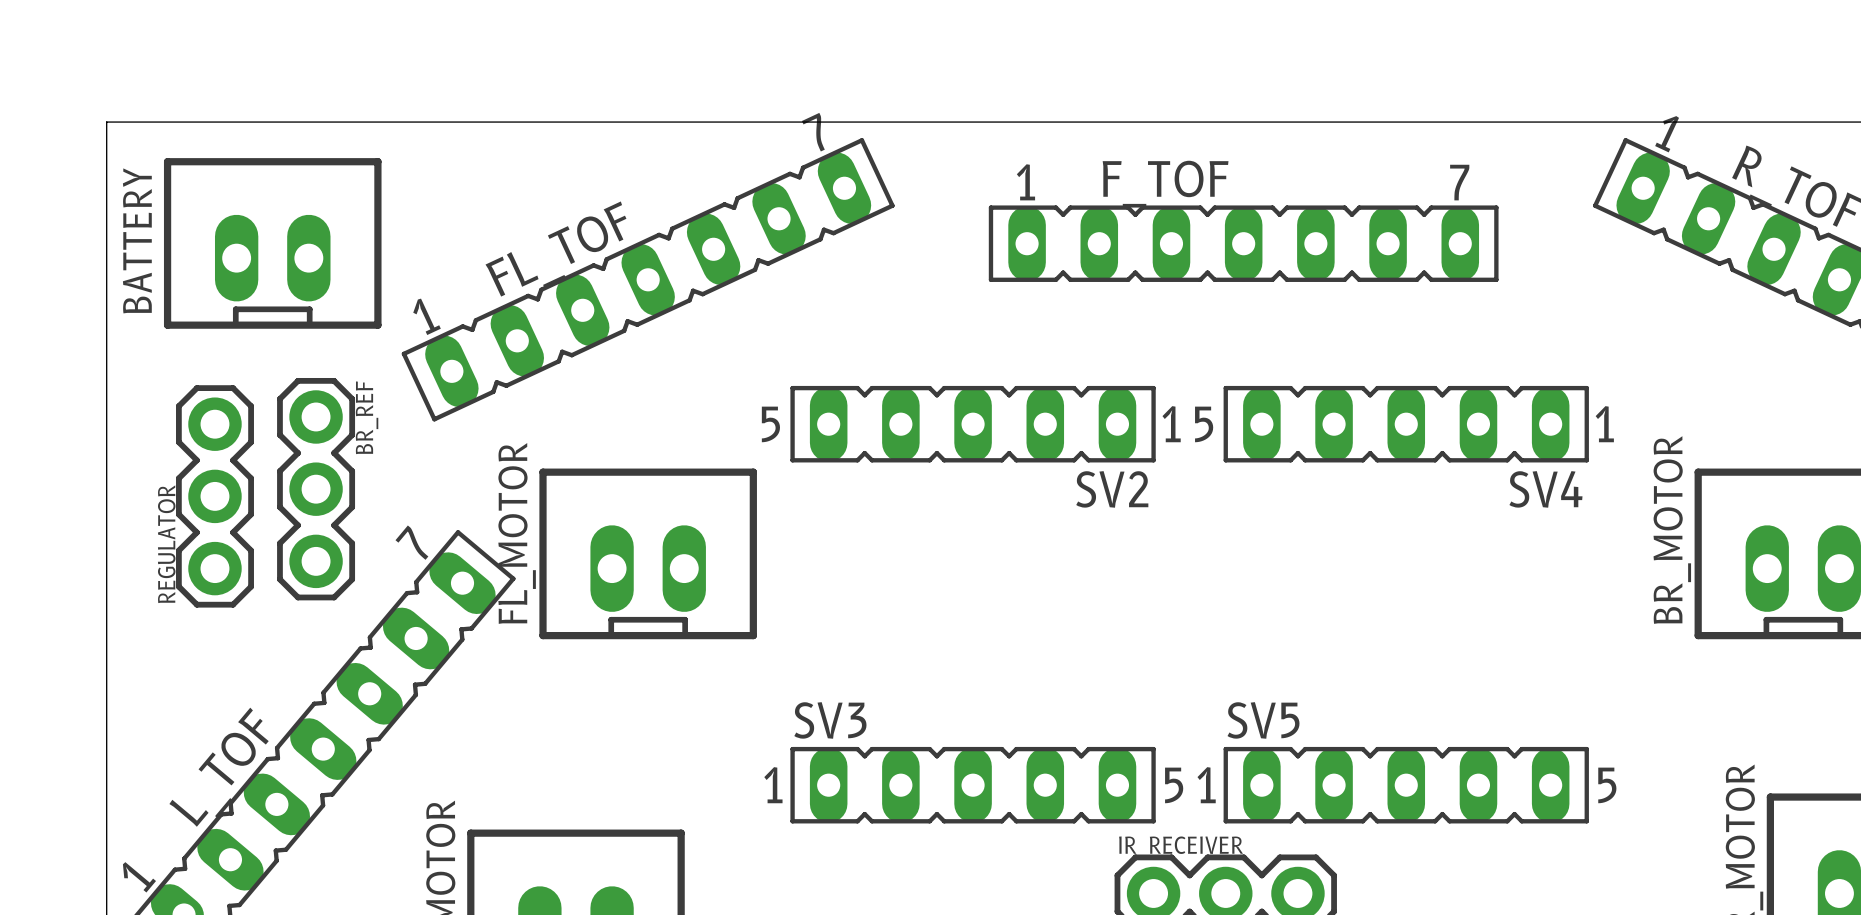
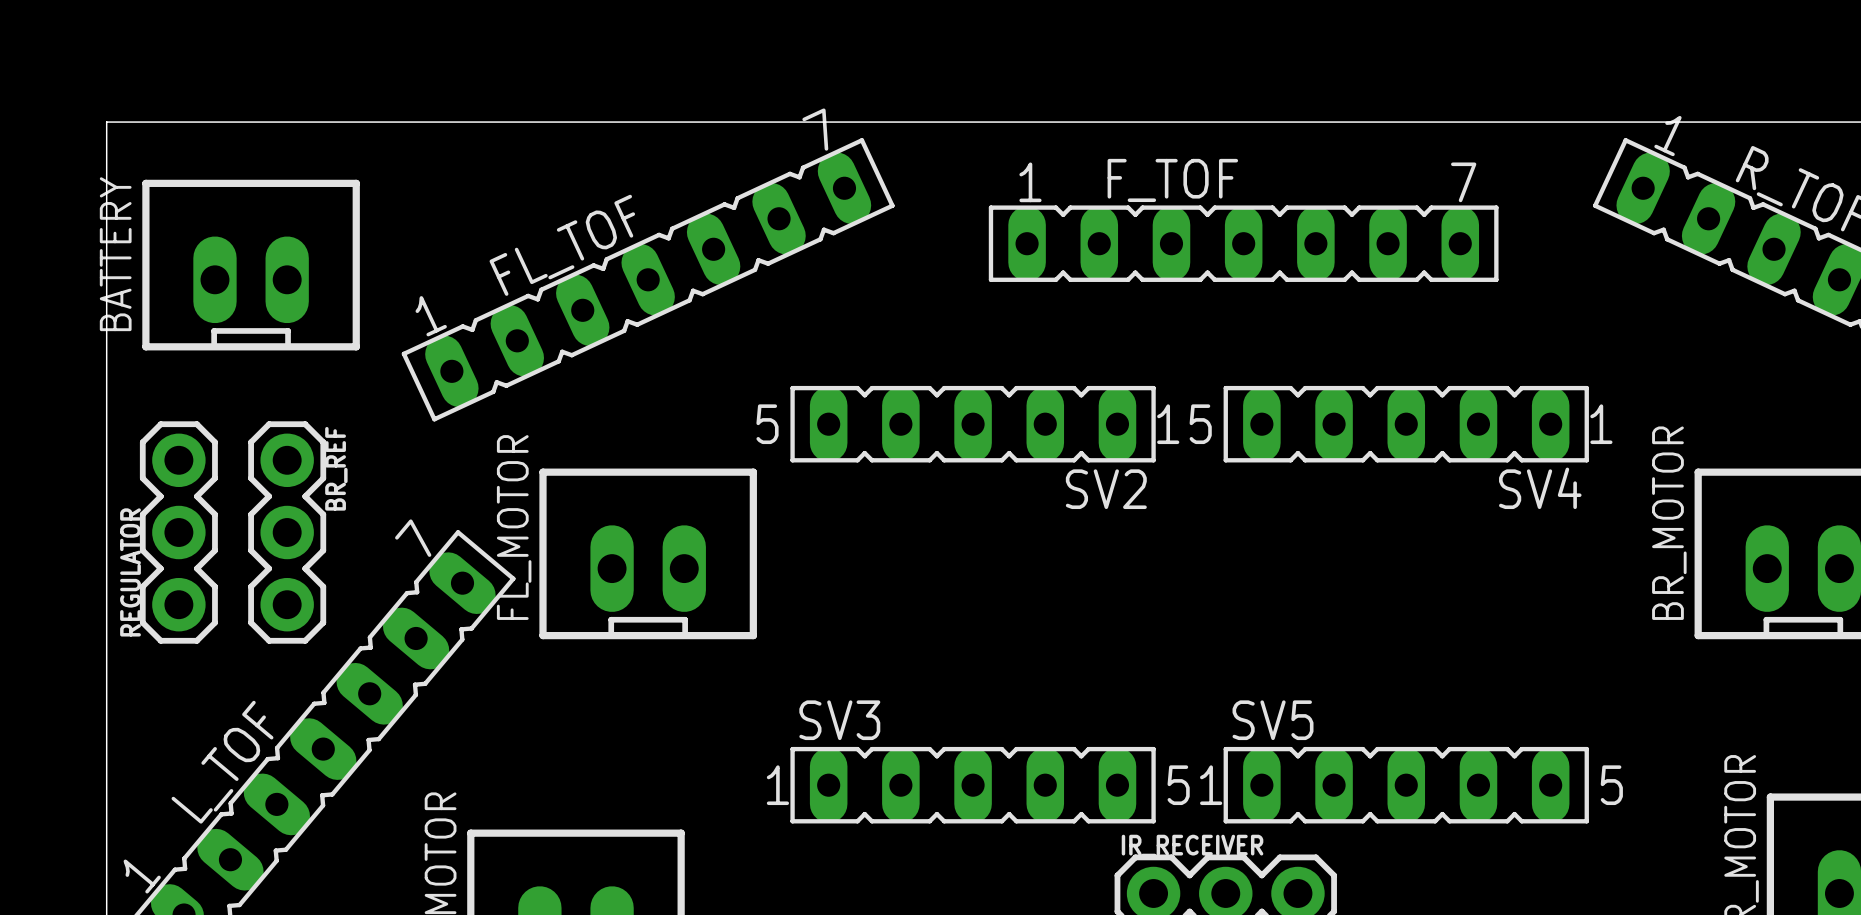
BATTERY position: (272, 243) -> (251, 265)
BR_REF position: (316, 489) -> (287, 532)
REGULATOR position: (214, 496) -> (178, 532)

